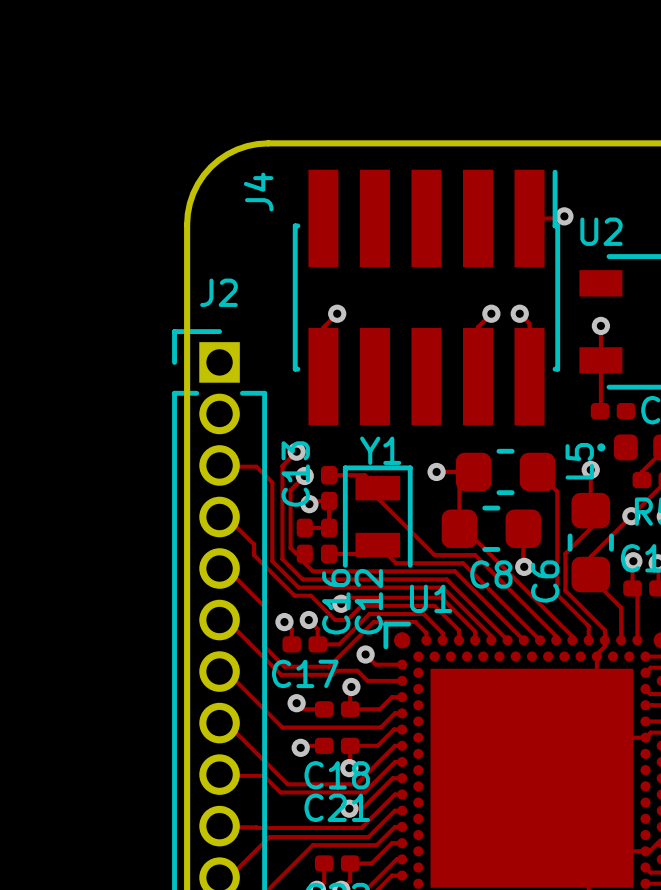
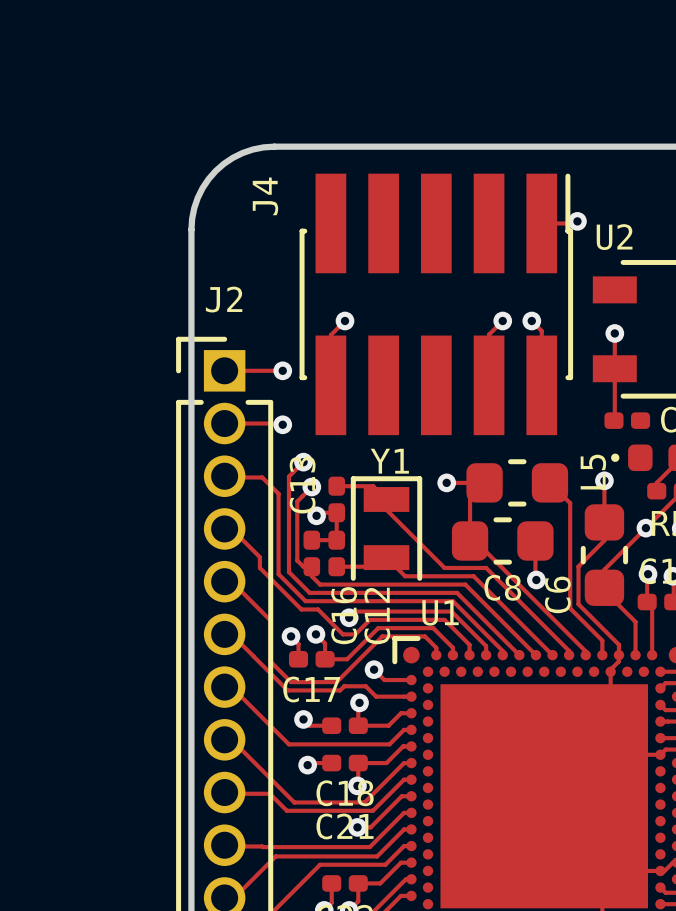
track: none -> (224, 370) (282, 370)
via: none -> (282, 370)
track: none -> (224, 423) (282, 424)
via: none -> (282, 424)

